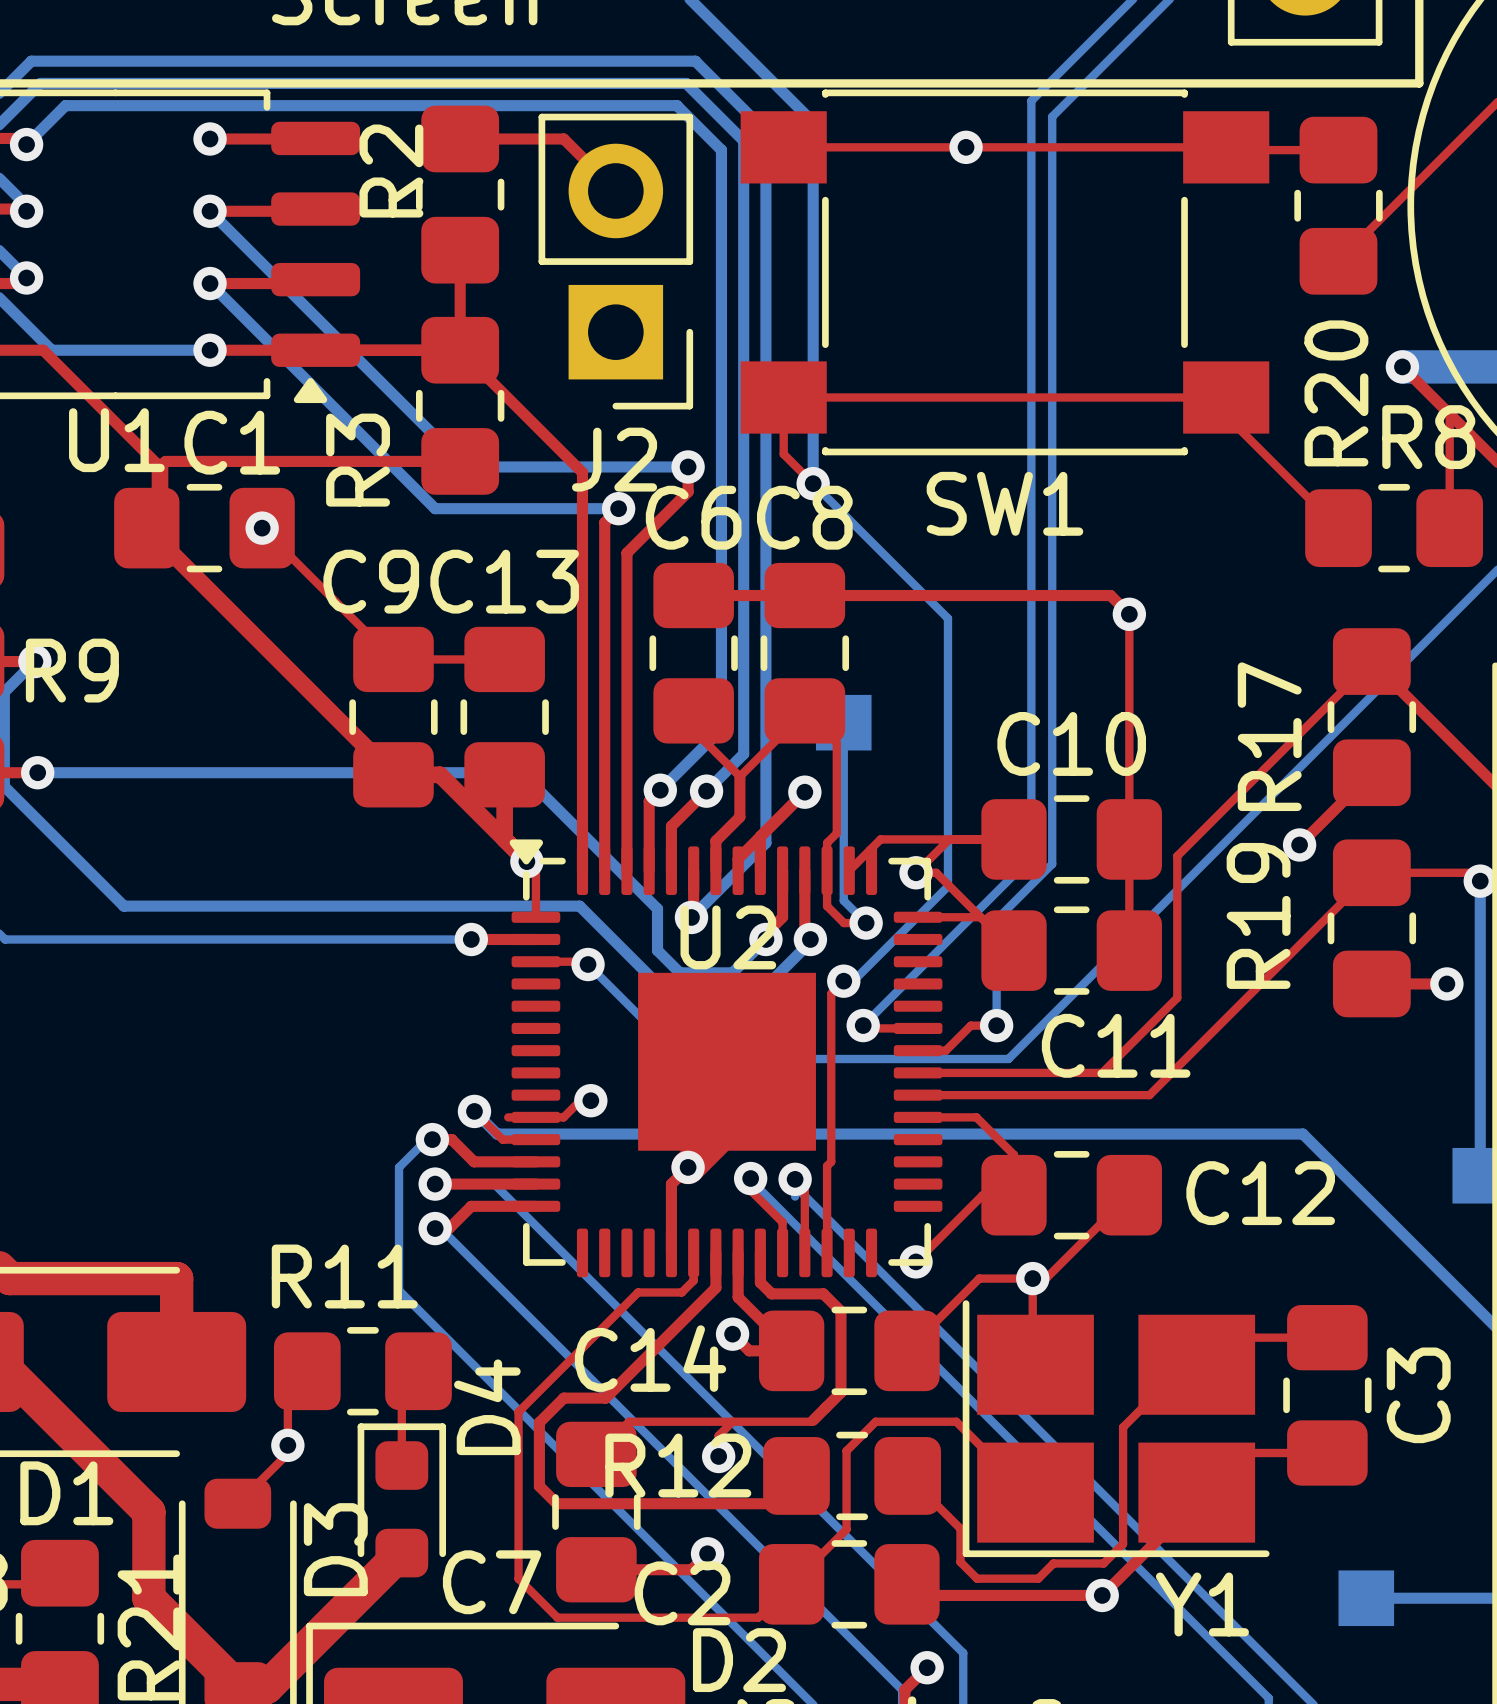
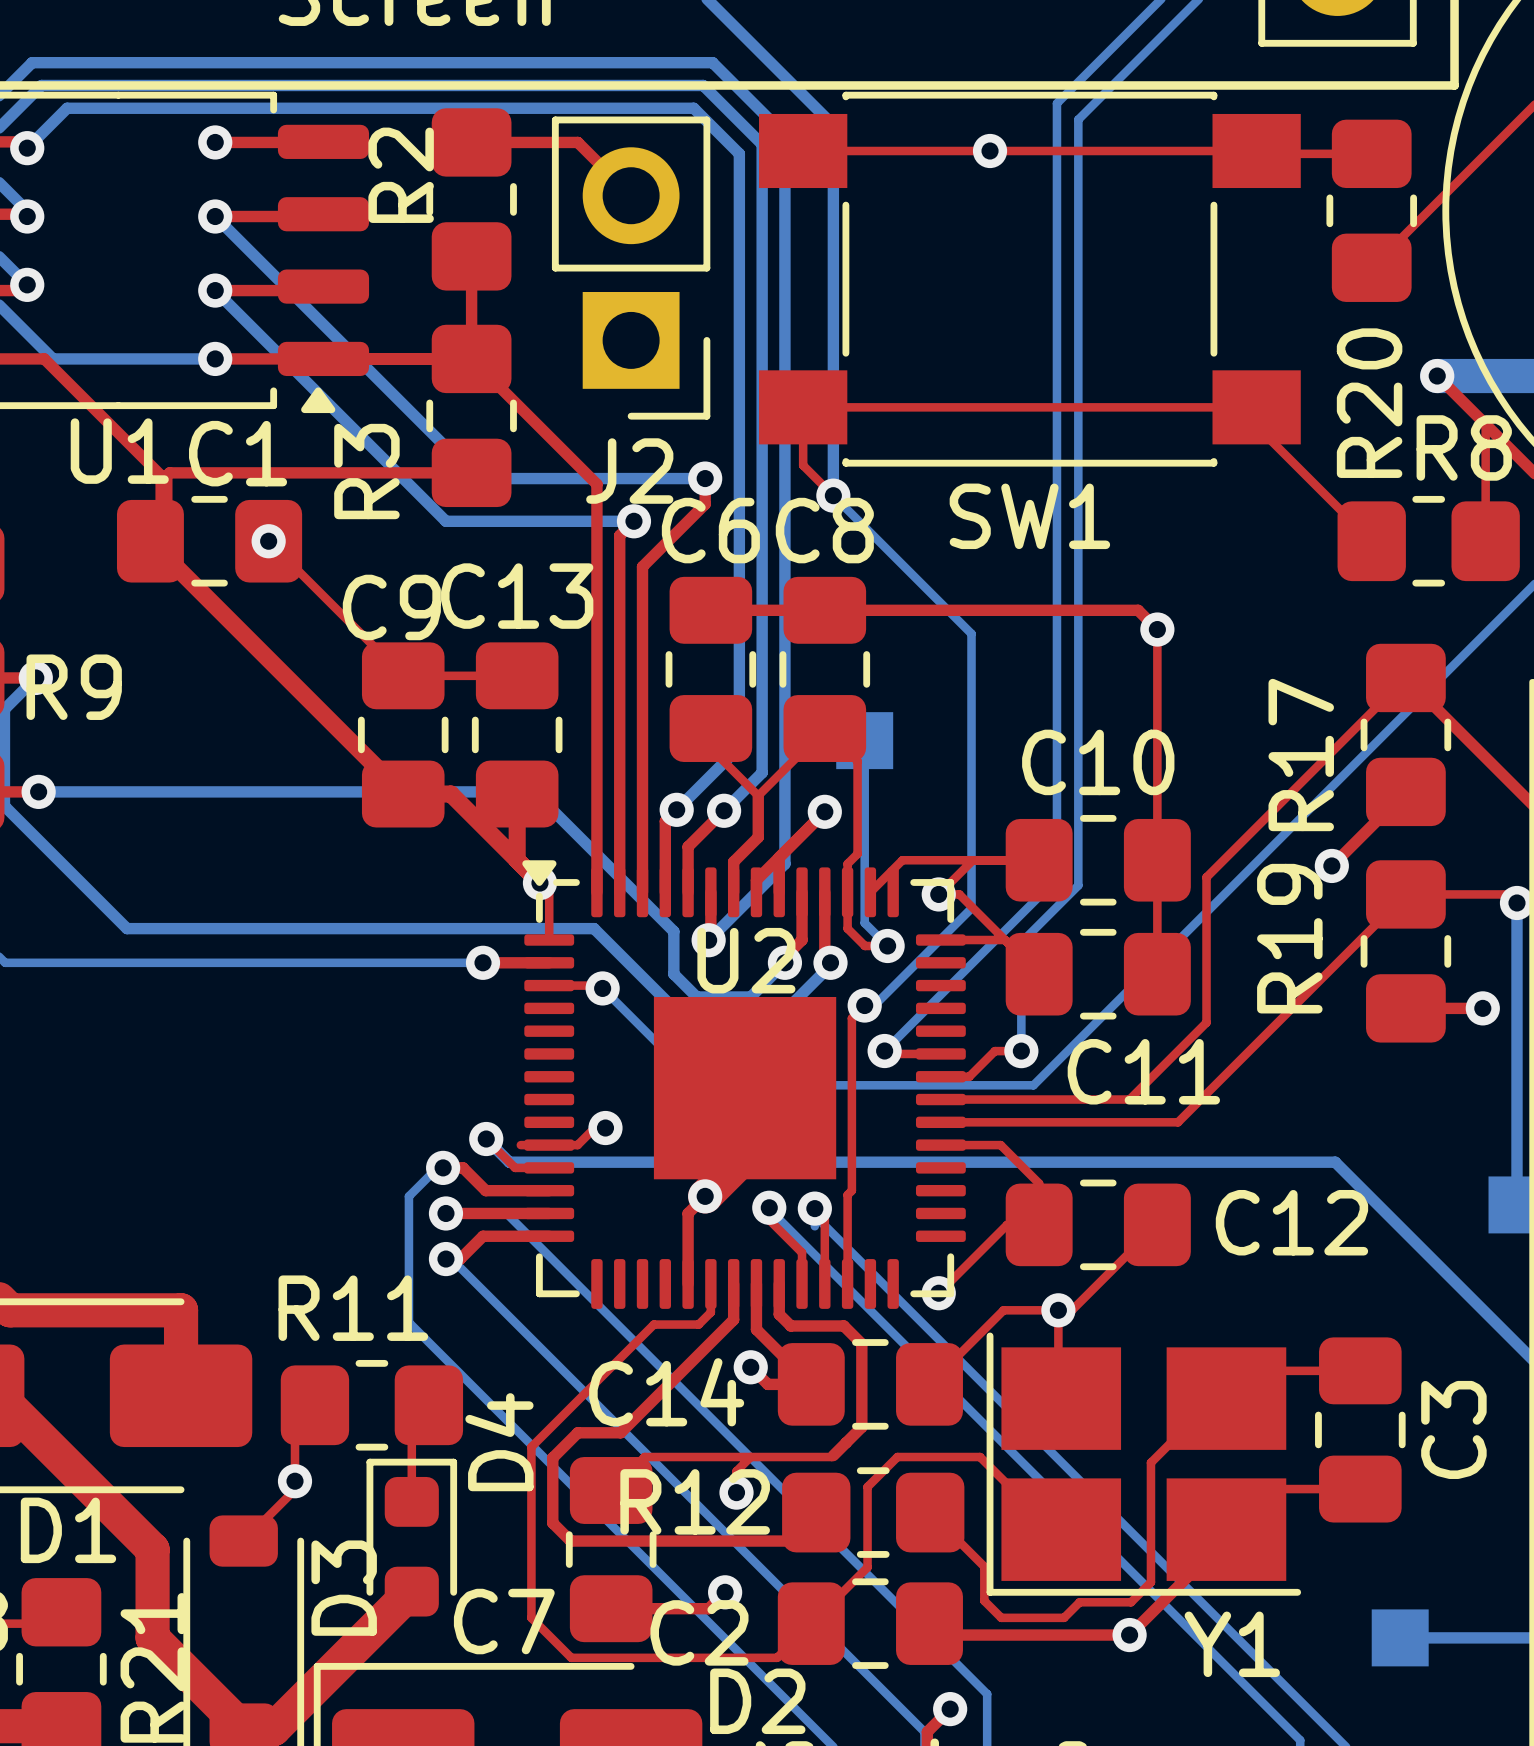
C9 name position: C9 (371, 581) -> C9 (391, 607)

